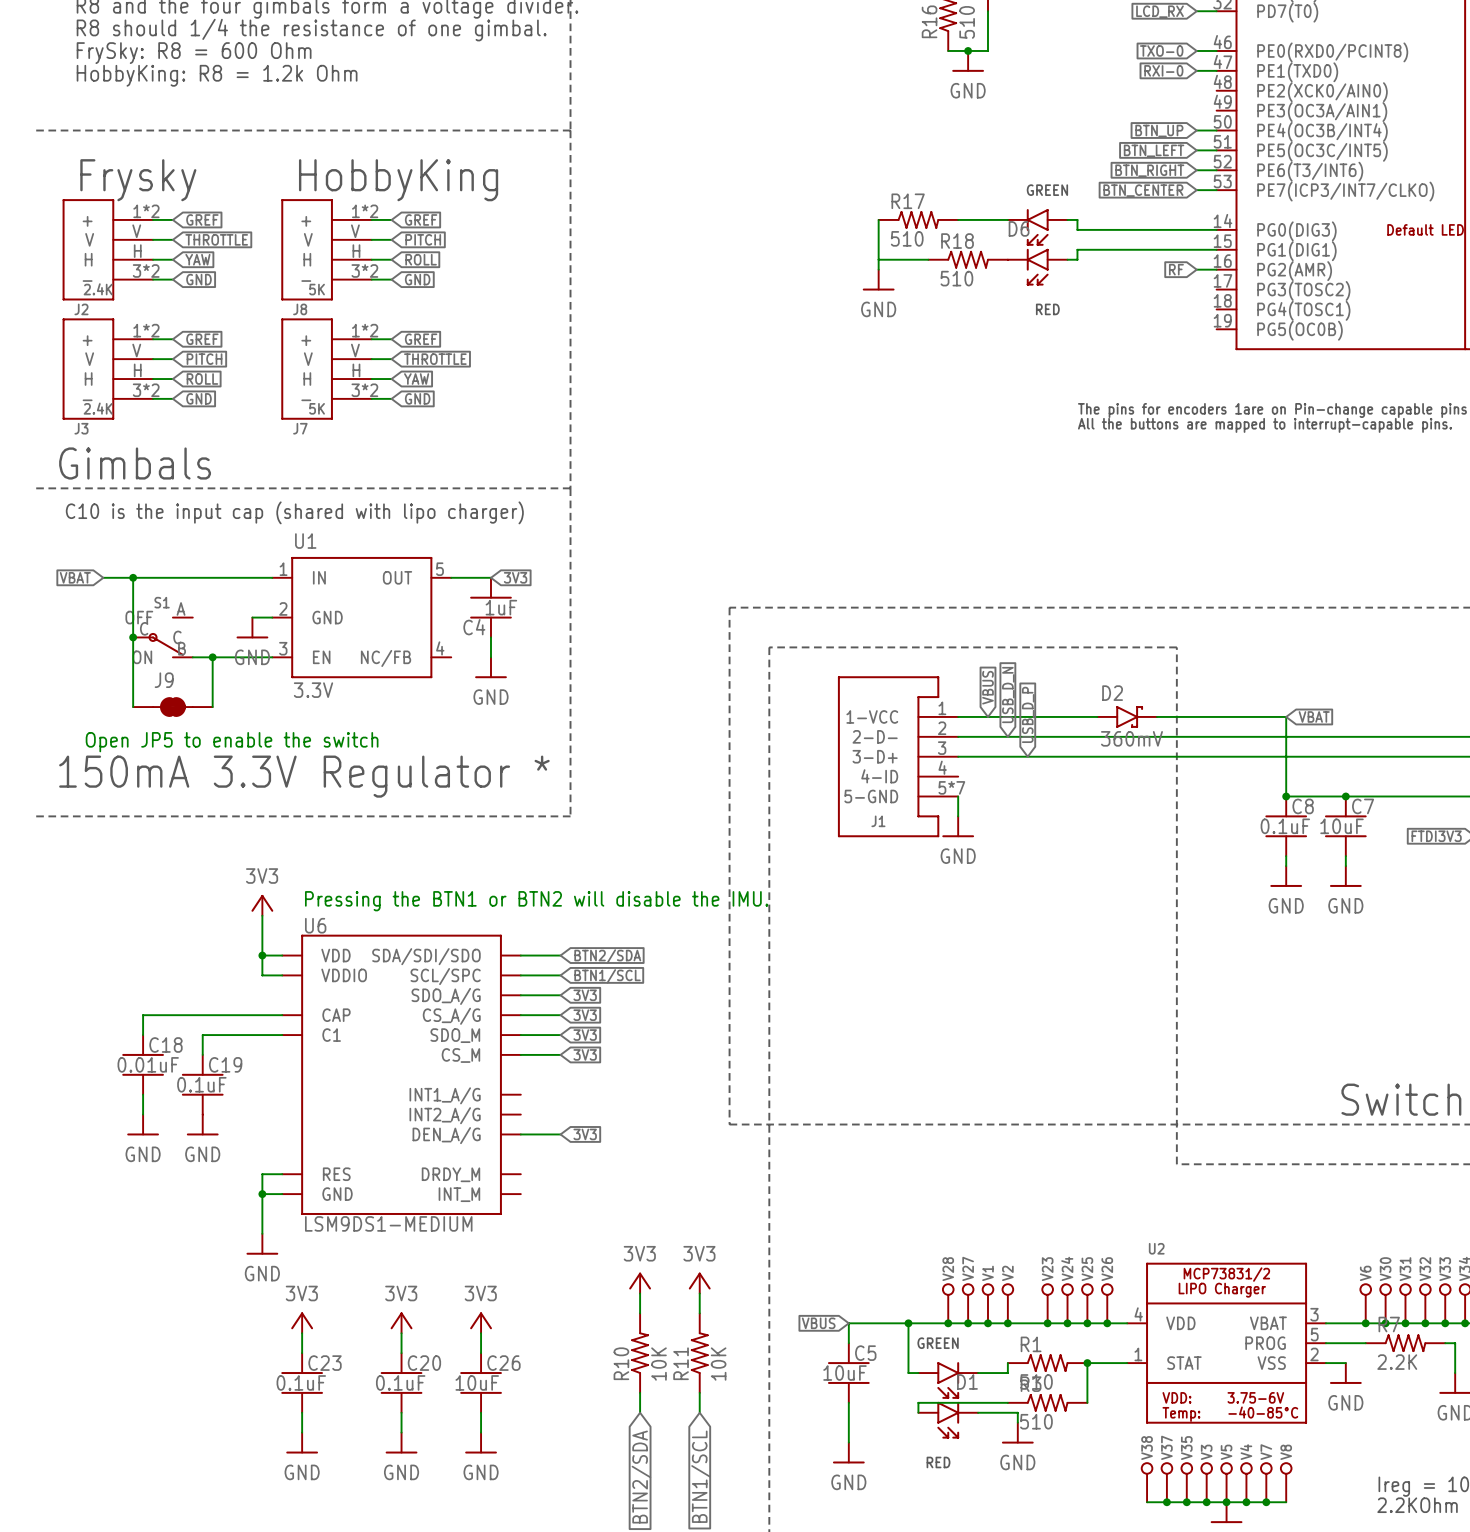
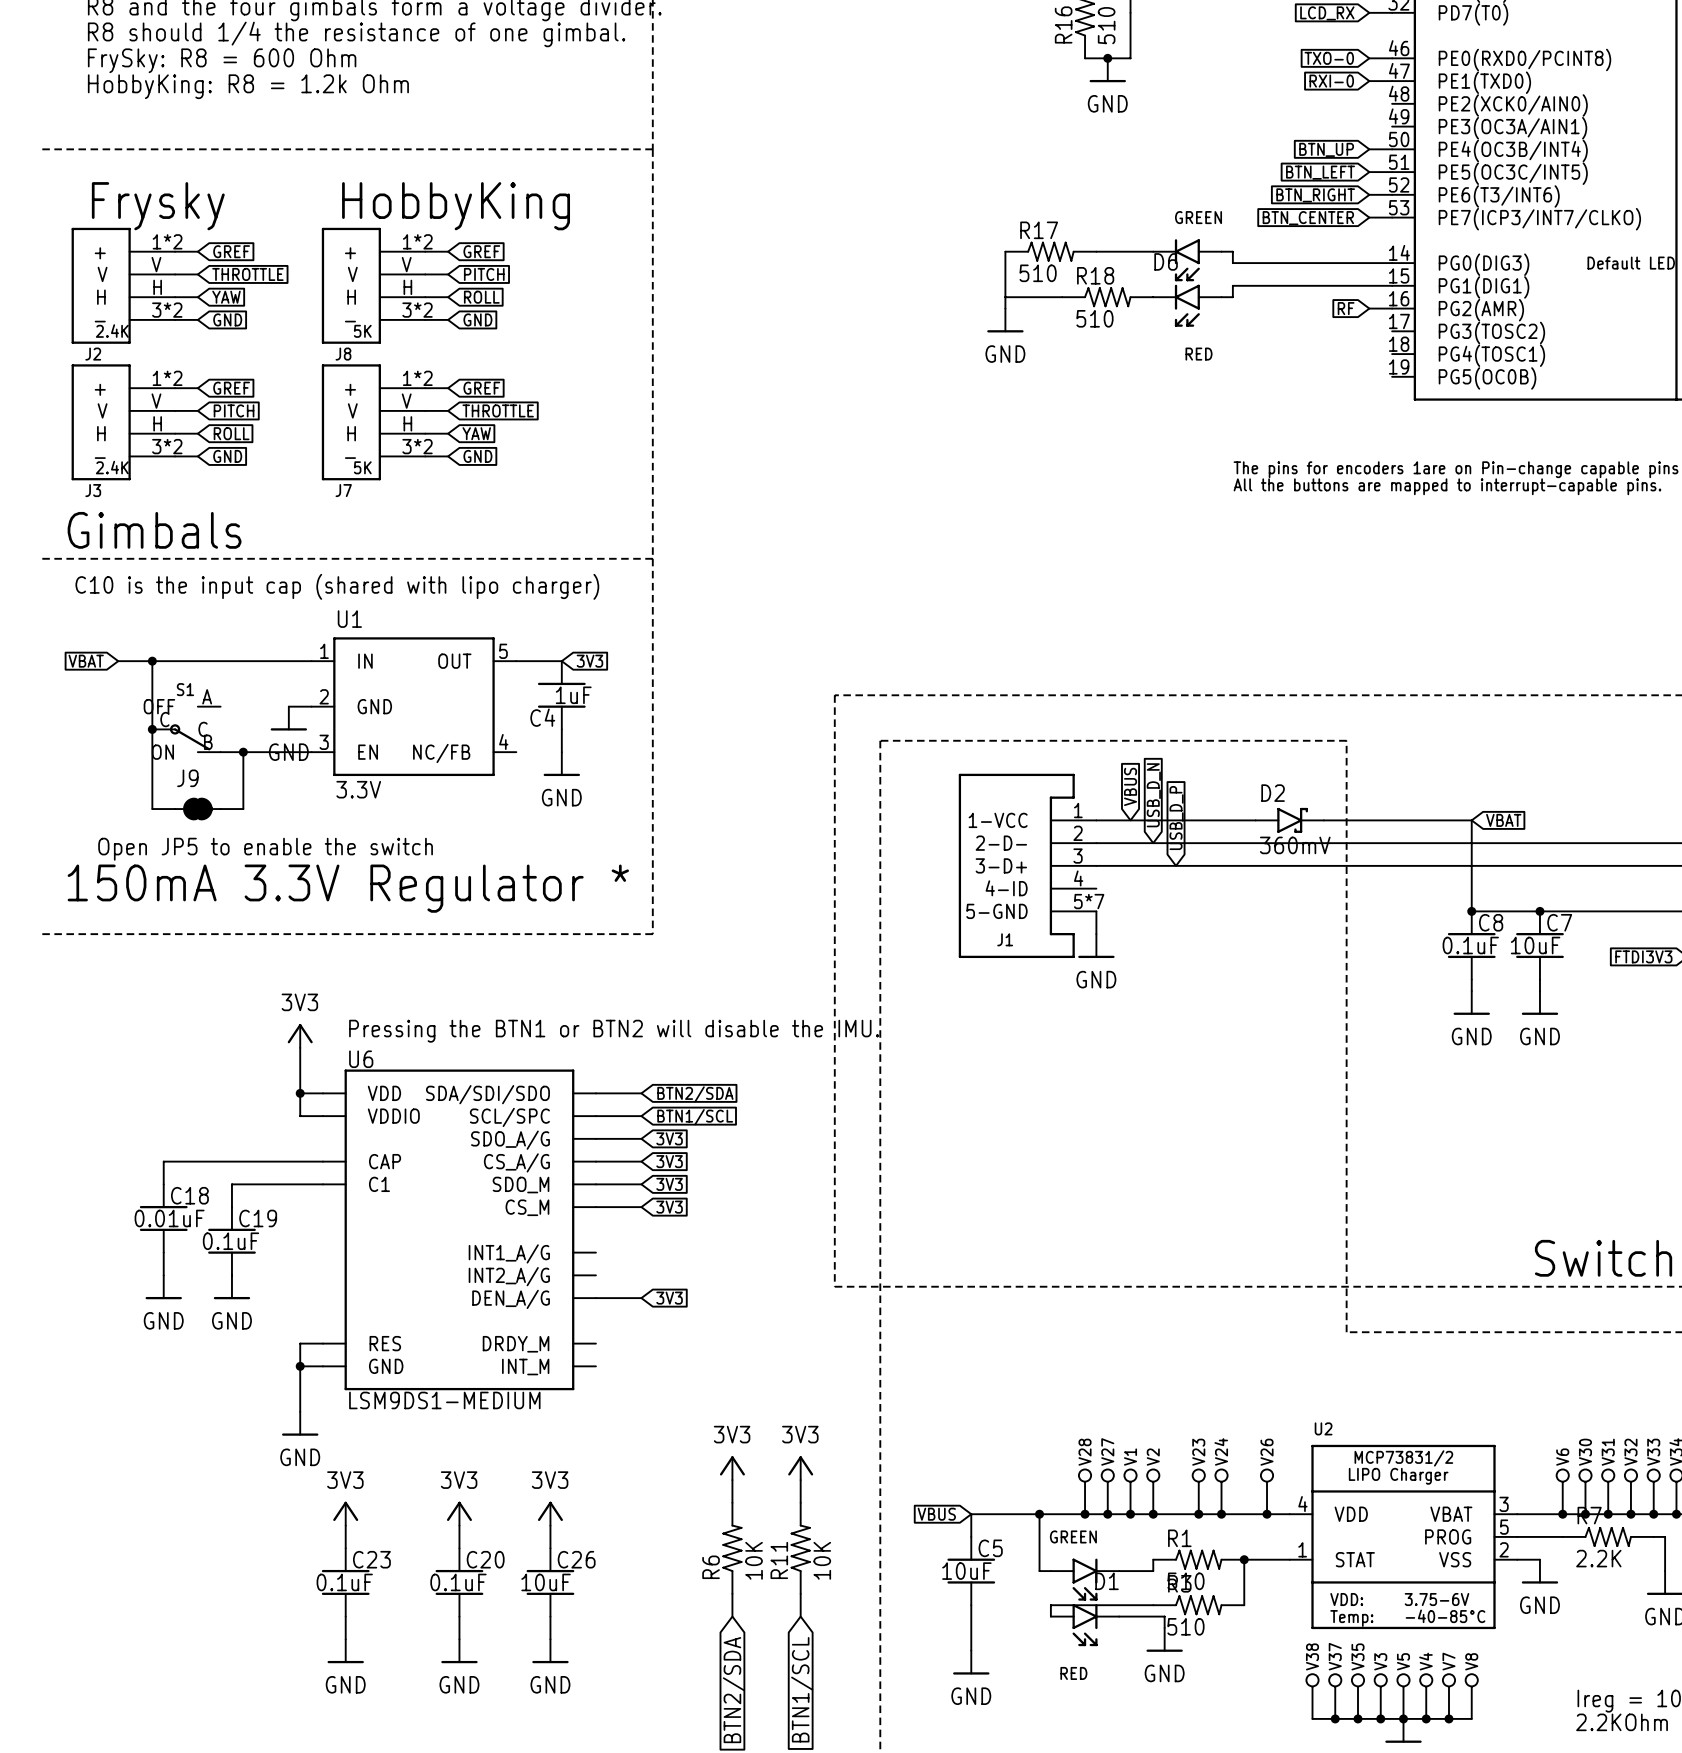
V25: (1087, 1303) -> none
junction: (1087, 1323) -> none
R10 name: R10 (621, 1363) -> R6 (711, 1567)

